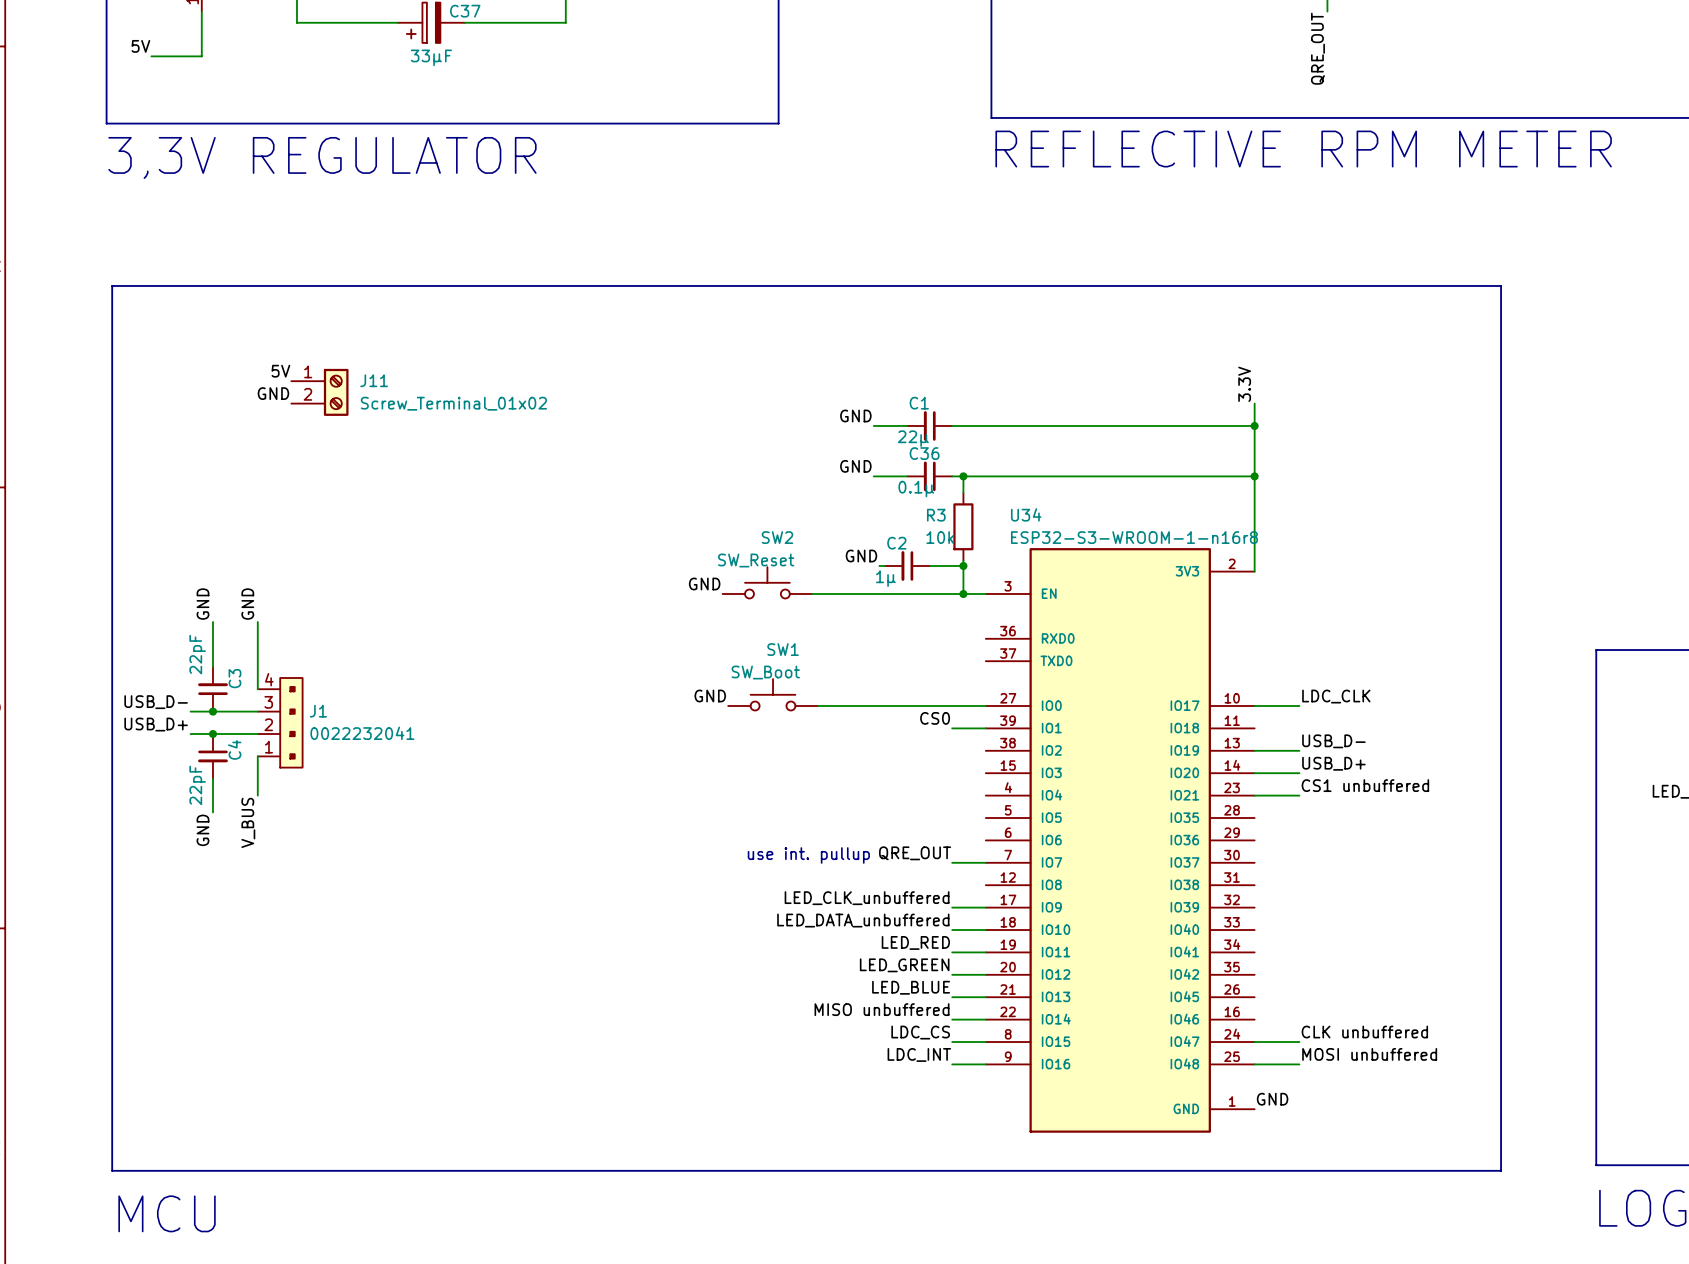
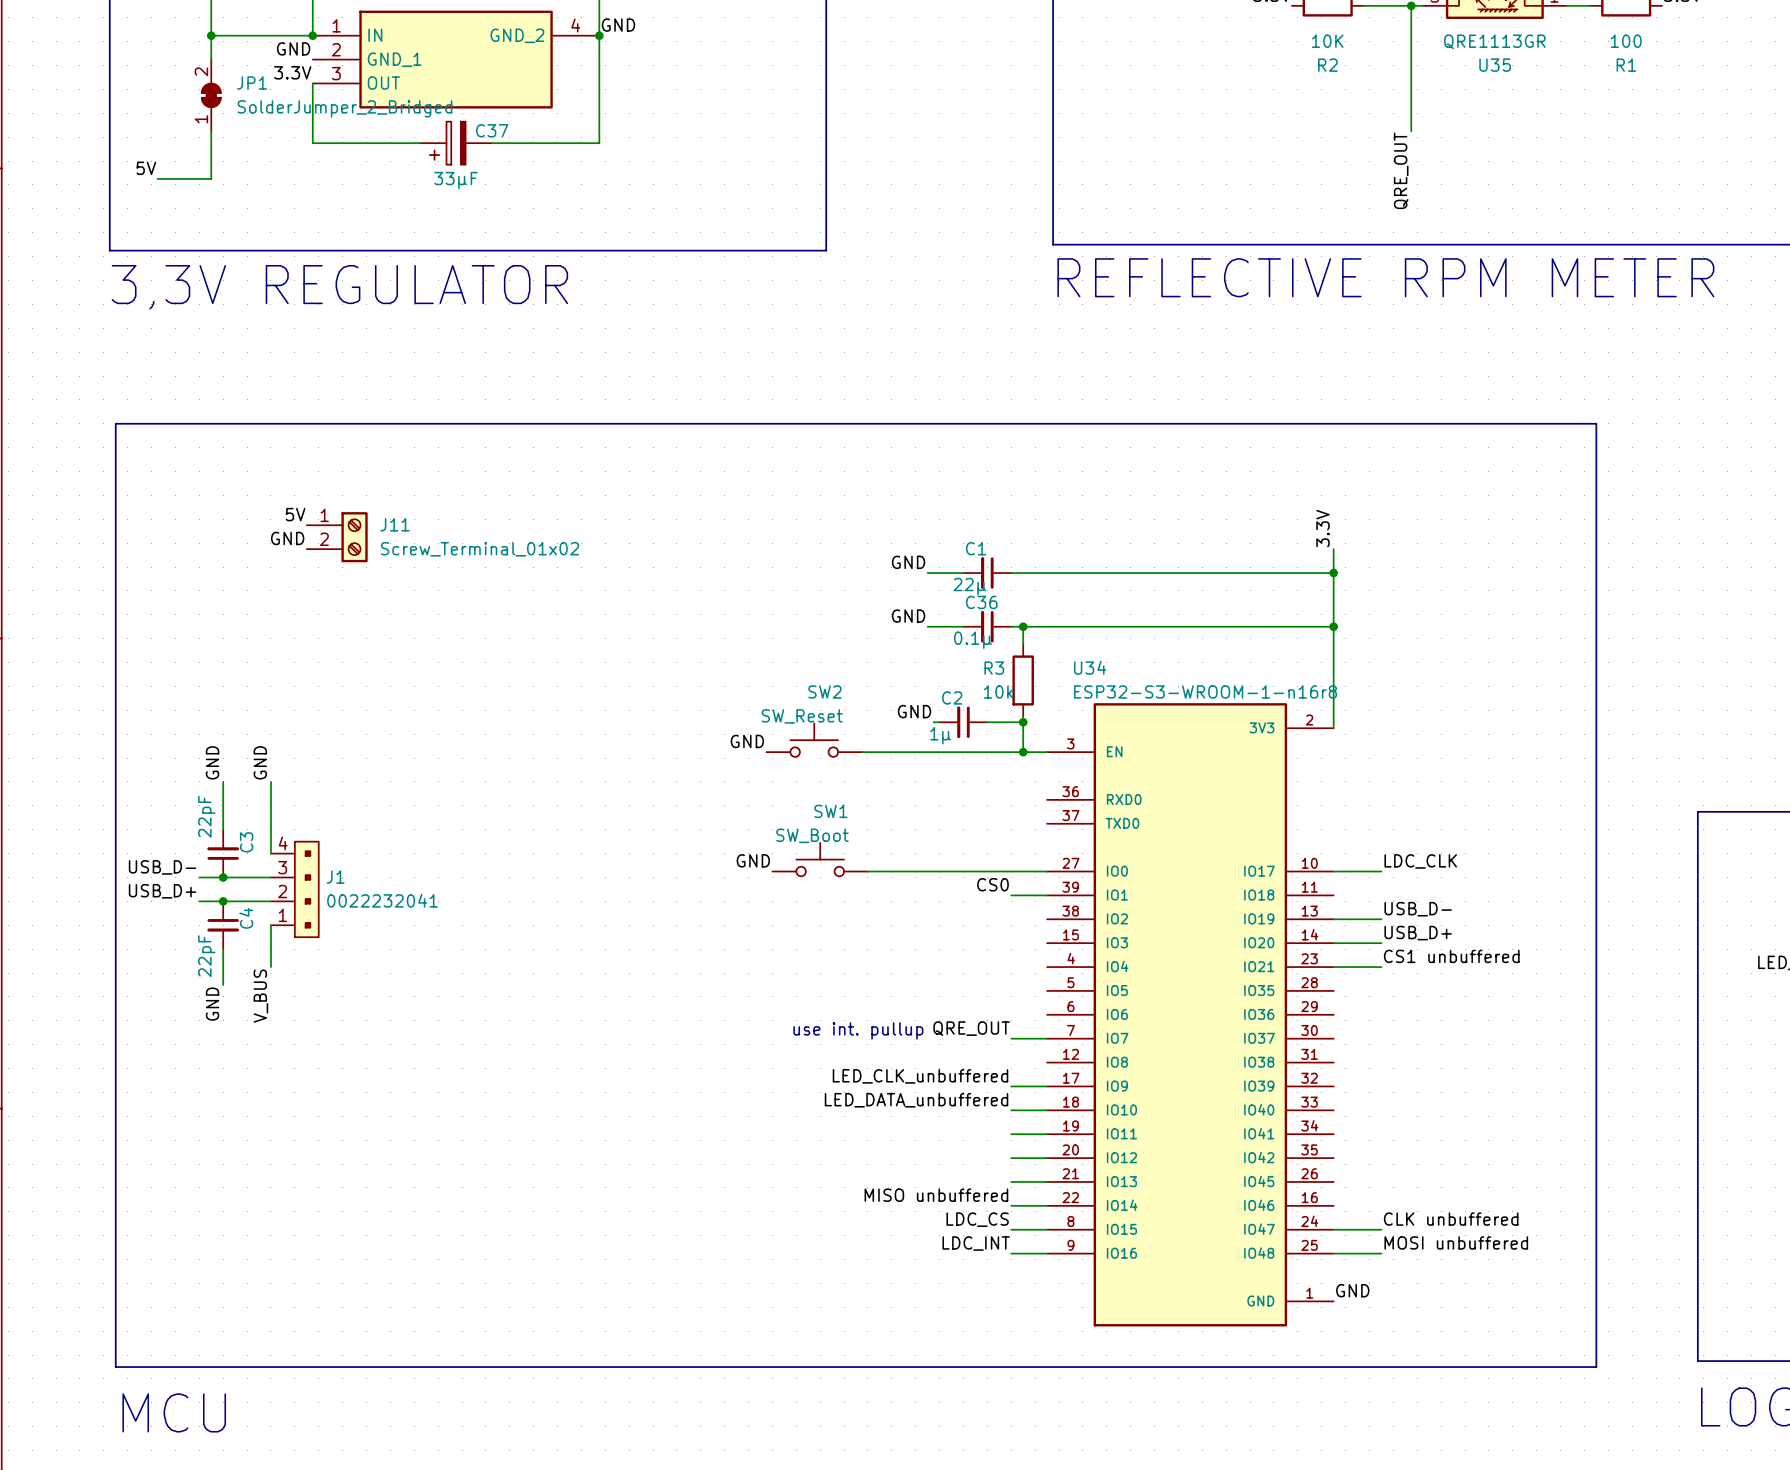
label: LED_RED (915, 942) -> none
label: LED_GREEN (904, 965) -> none
label: LED_BLUE (911, 987) -> none

